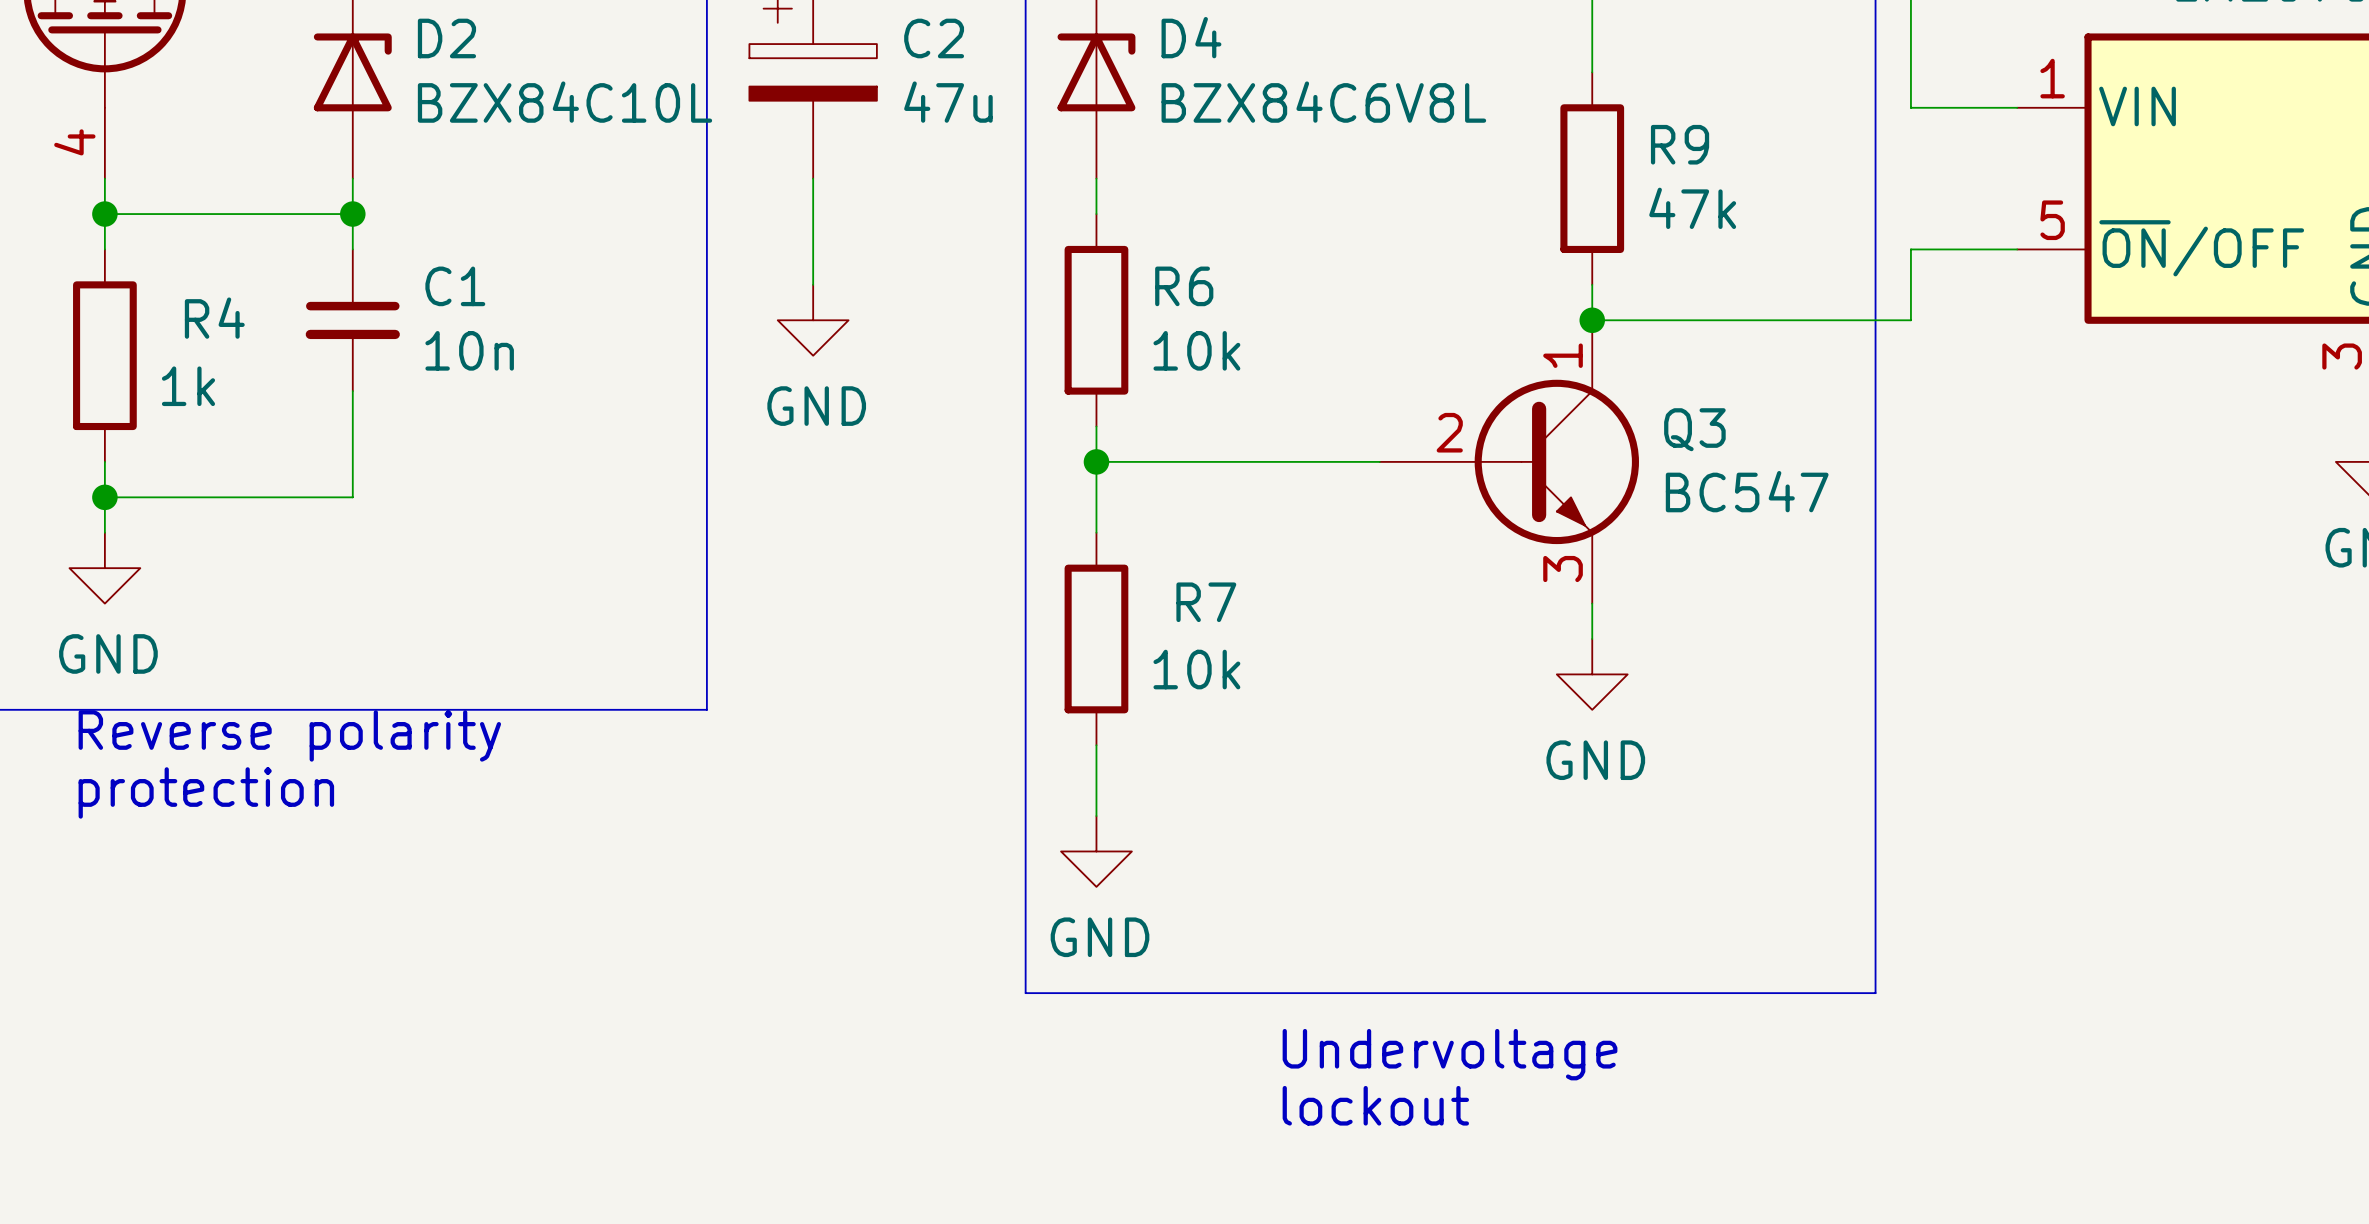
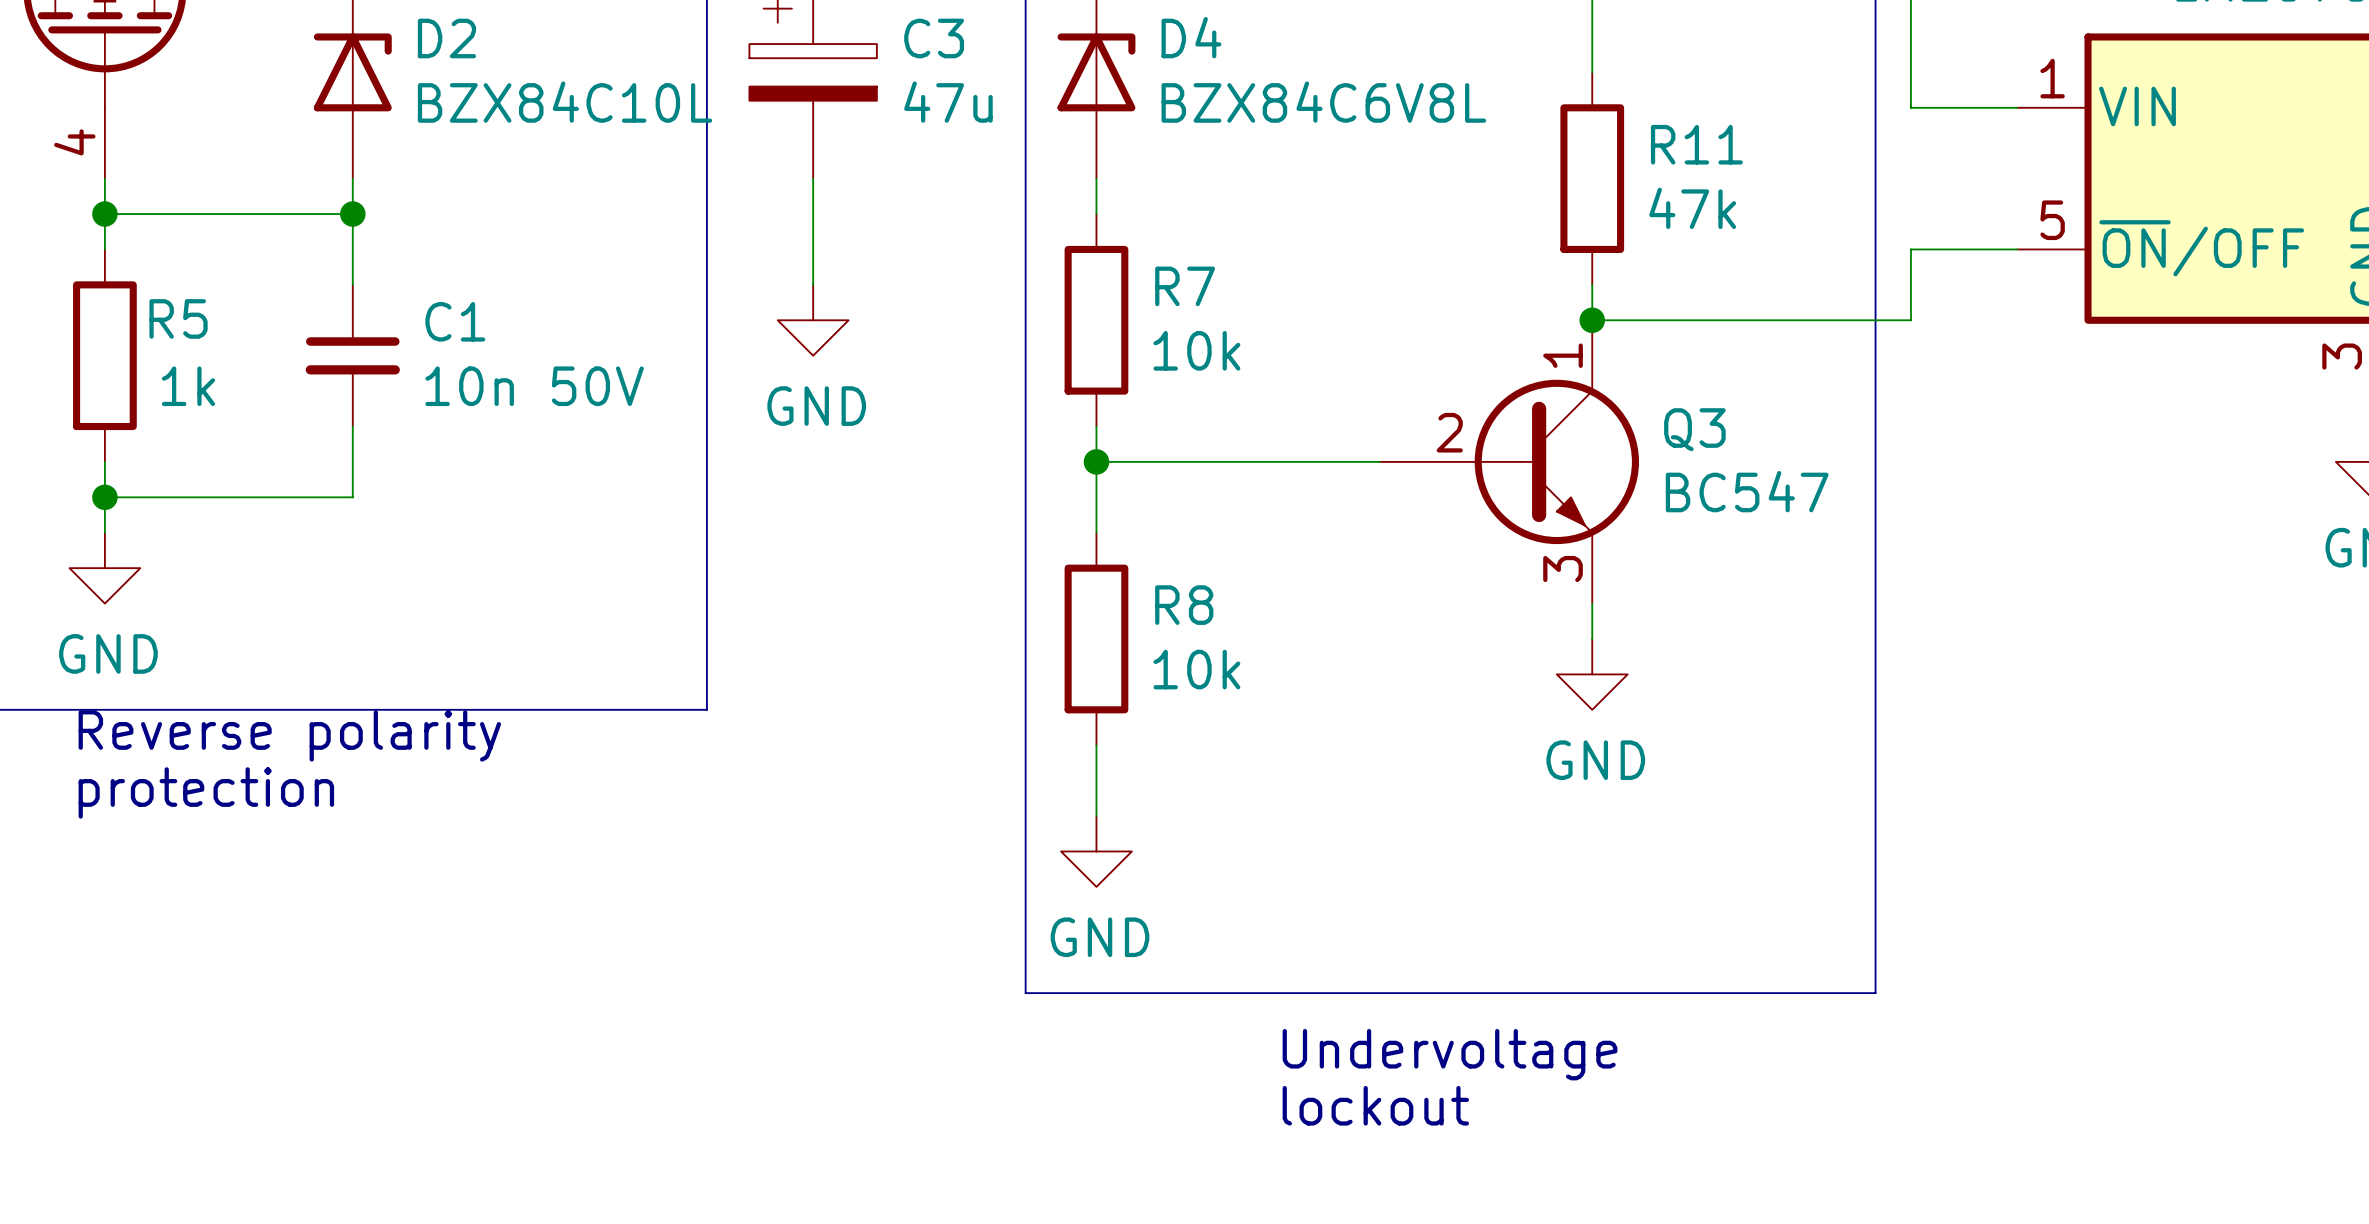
C2 name: C2 (934, 38) -> C3 (934, 38)
R9 name: R9 (1680, 144) -> R11 (1696, 144)
R6 name: R6 (1184, 286) -> R7 (1185, 286)
R4 name: R4 (214, 318) -> R5 (178, 318)
C1 position: (352, 320) -> (352, 355)
C1 value: 10n (469, 350) -> 10n 50V (534, 386)
R7 name: R7 (1206, 602) -> R8 (1184, 605)

